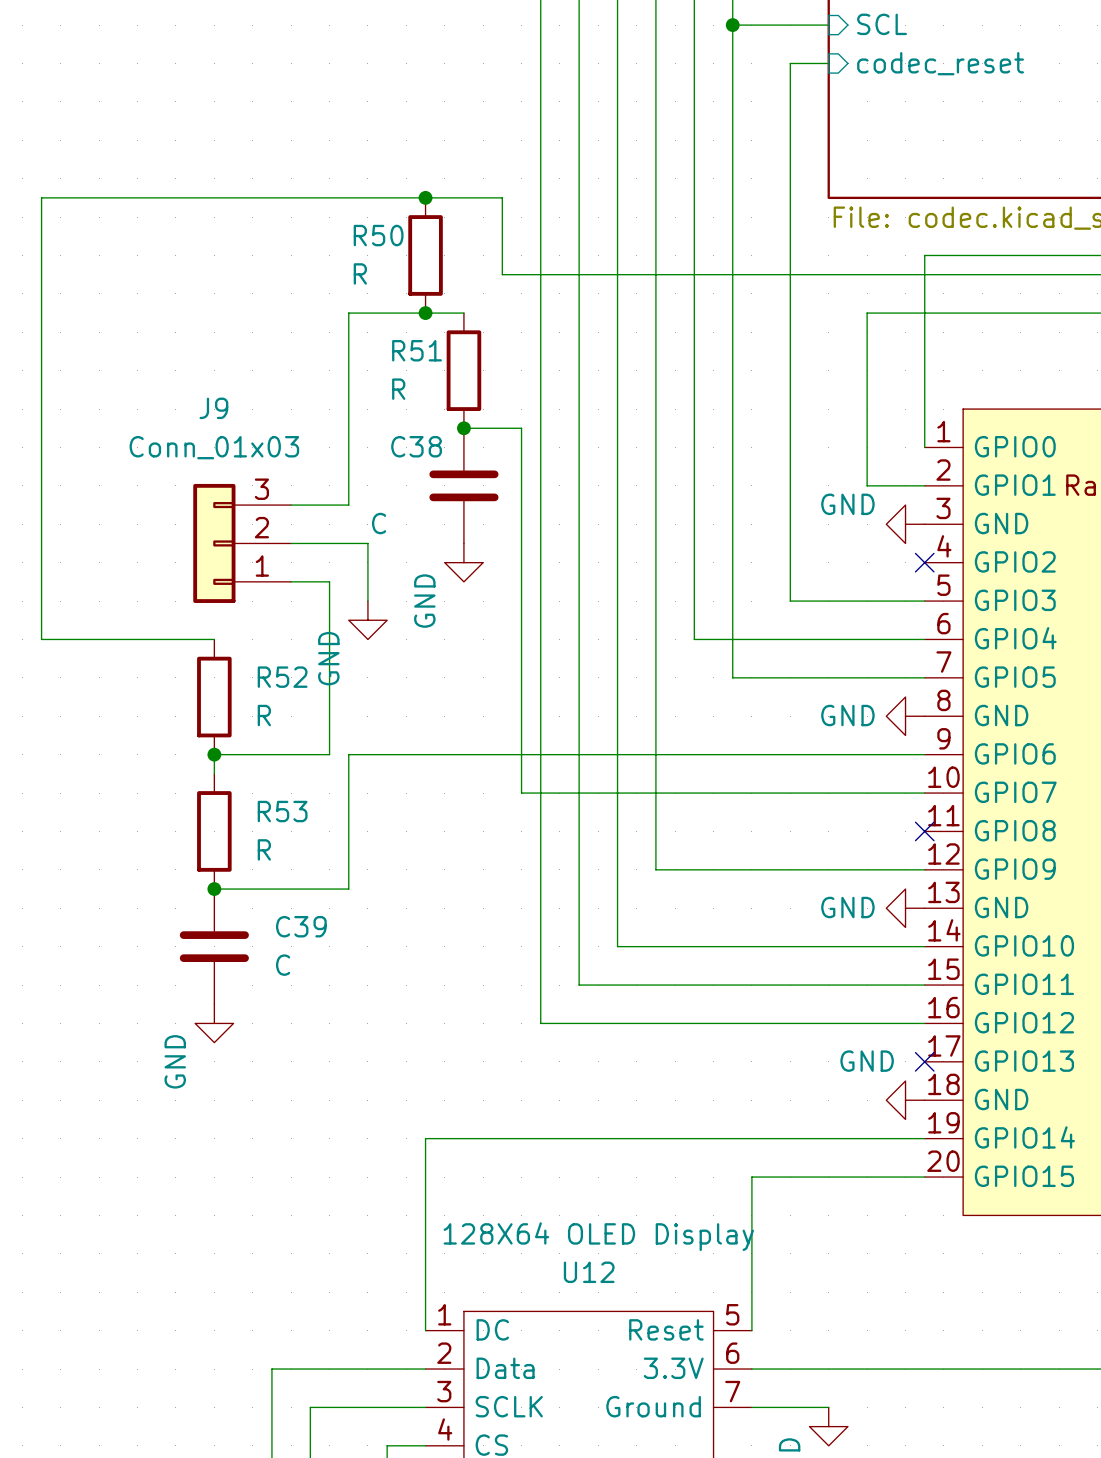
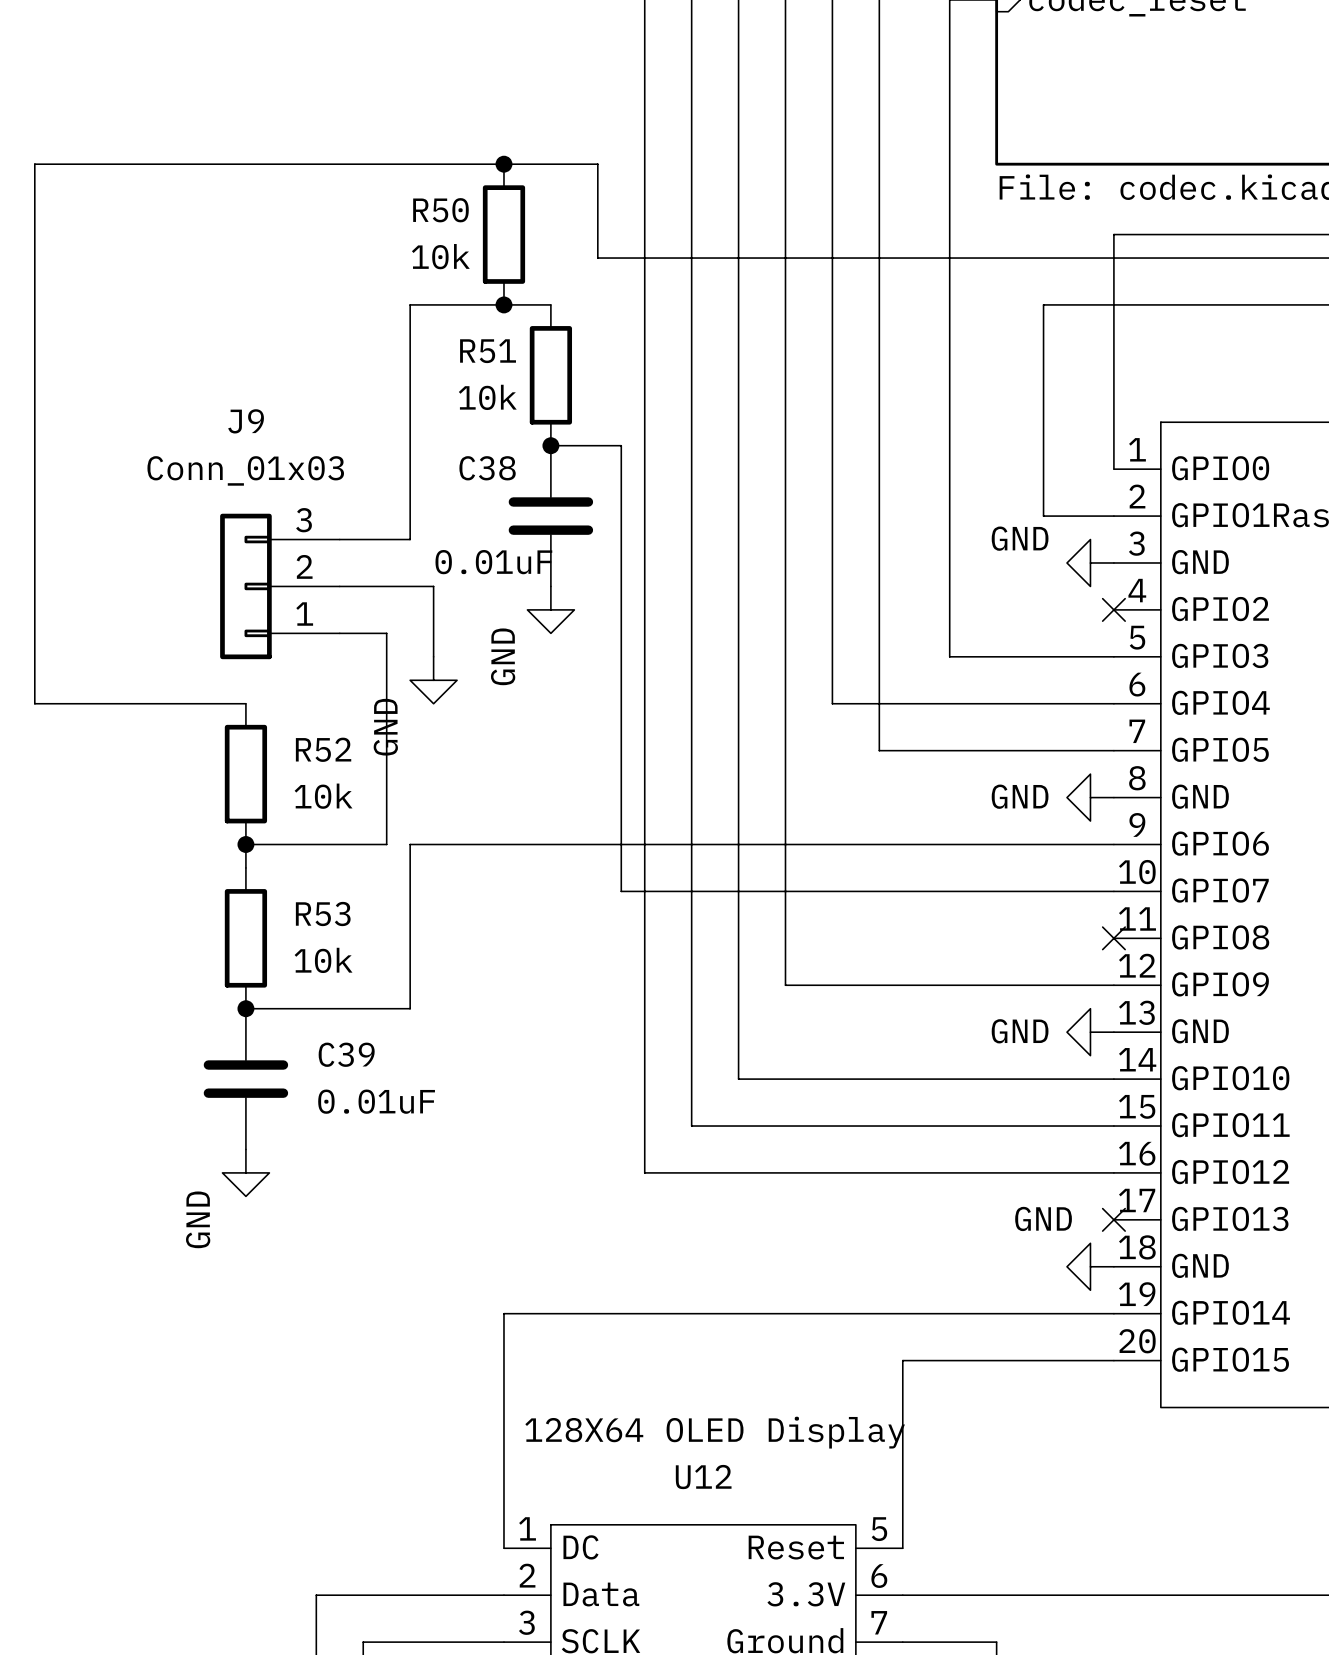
R50 value: R (360, 273) -> 10k (440, 256)
R51 value: R (398, 389) -> 10k (487, 397)
C38 value: C (379, 523) -> 0.01uF (493, 562)
R52 value: R (264, 715) -> 10k (323, 796)
R53 value: R (264, 849) -> 10k (323, 960)
C39 value: C (283, 965) -> 0.01uF (376, 1101)

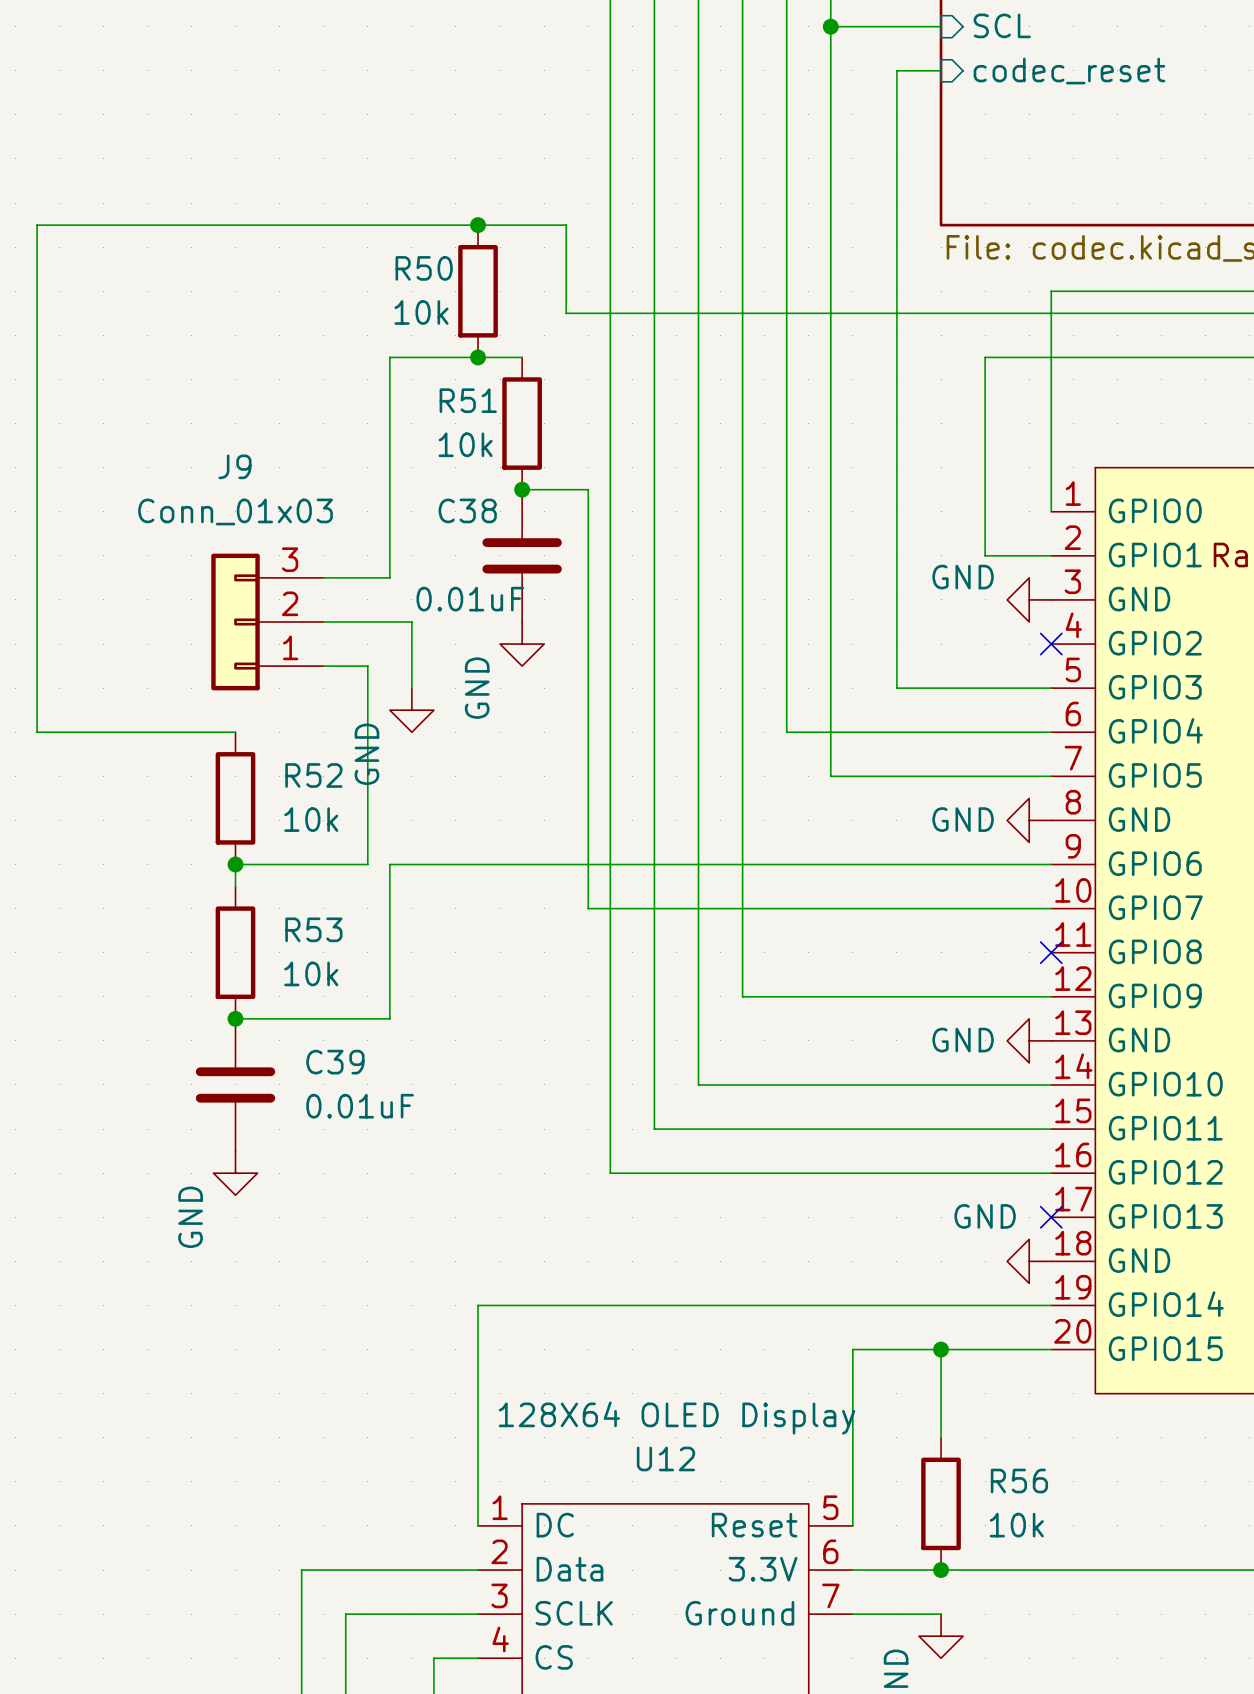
wire: none -> (941, 1349) (941, 1437)
junction: none -> (941, 1349)
R56: none -> 10k (941, 1503)
junction: none -> (941, 1570)

